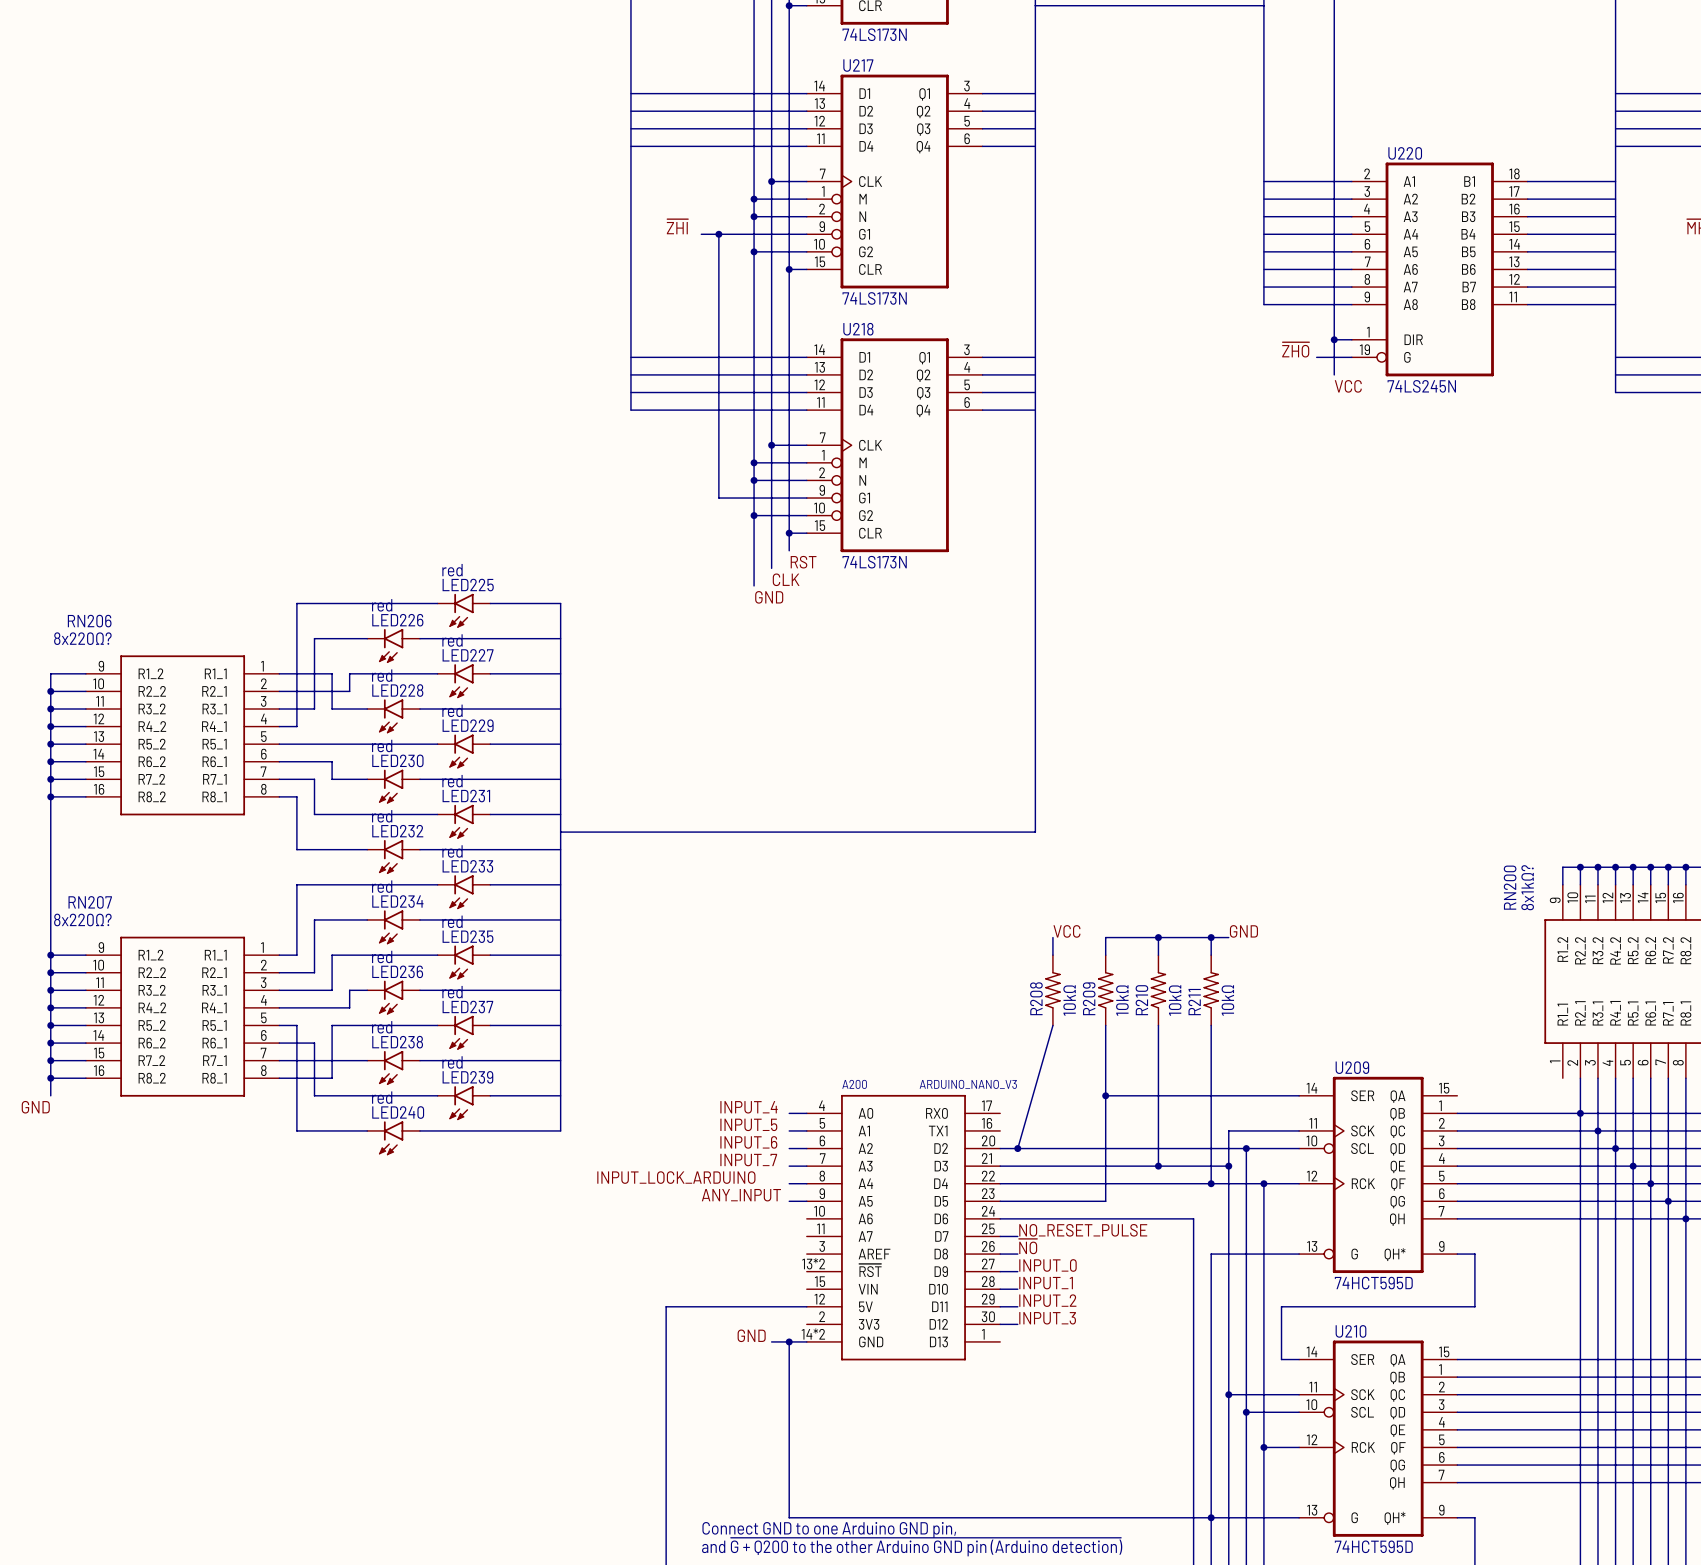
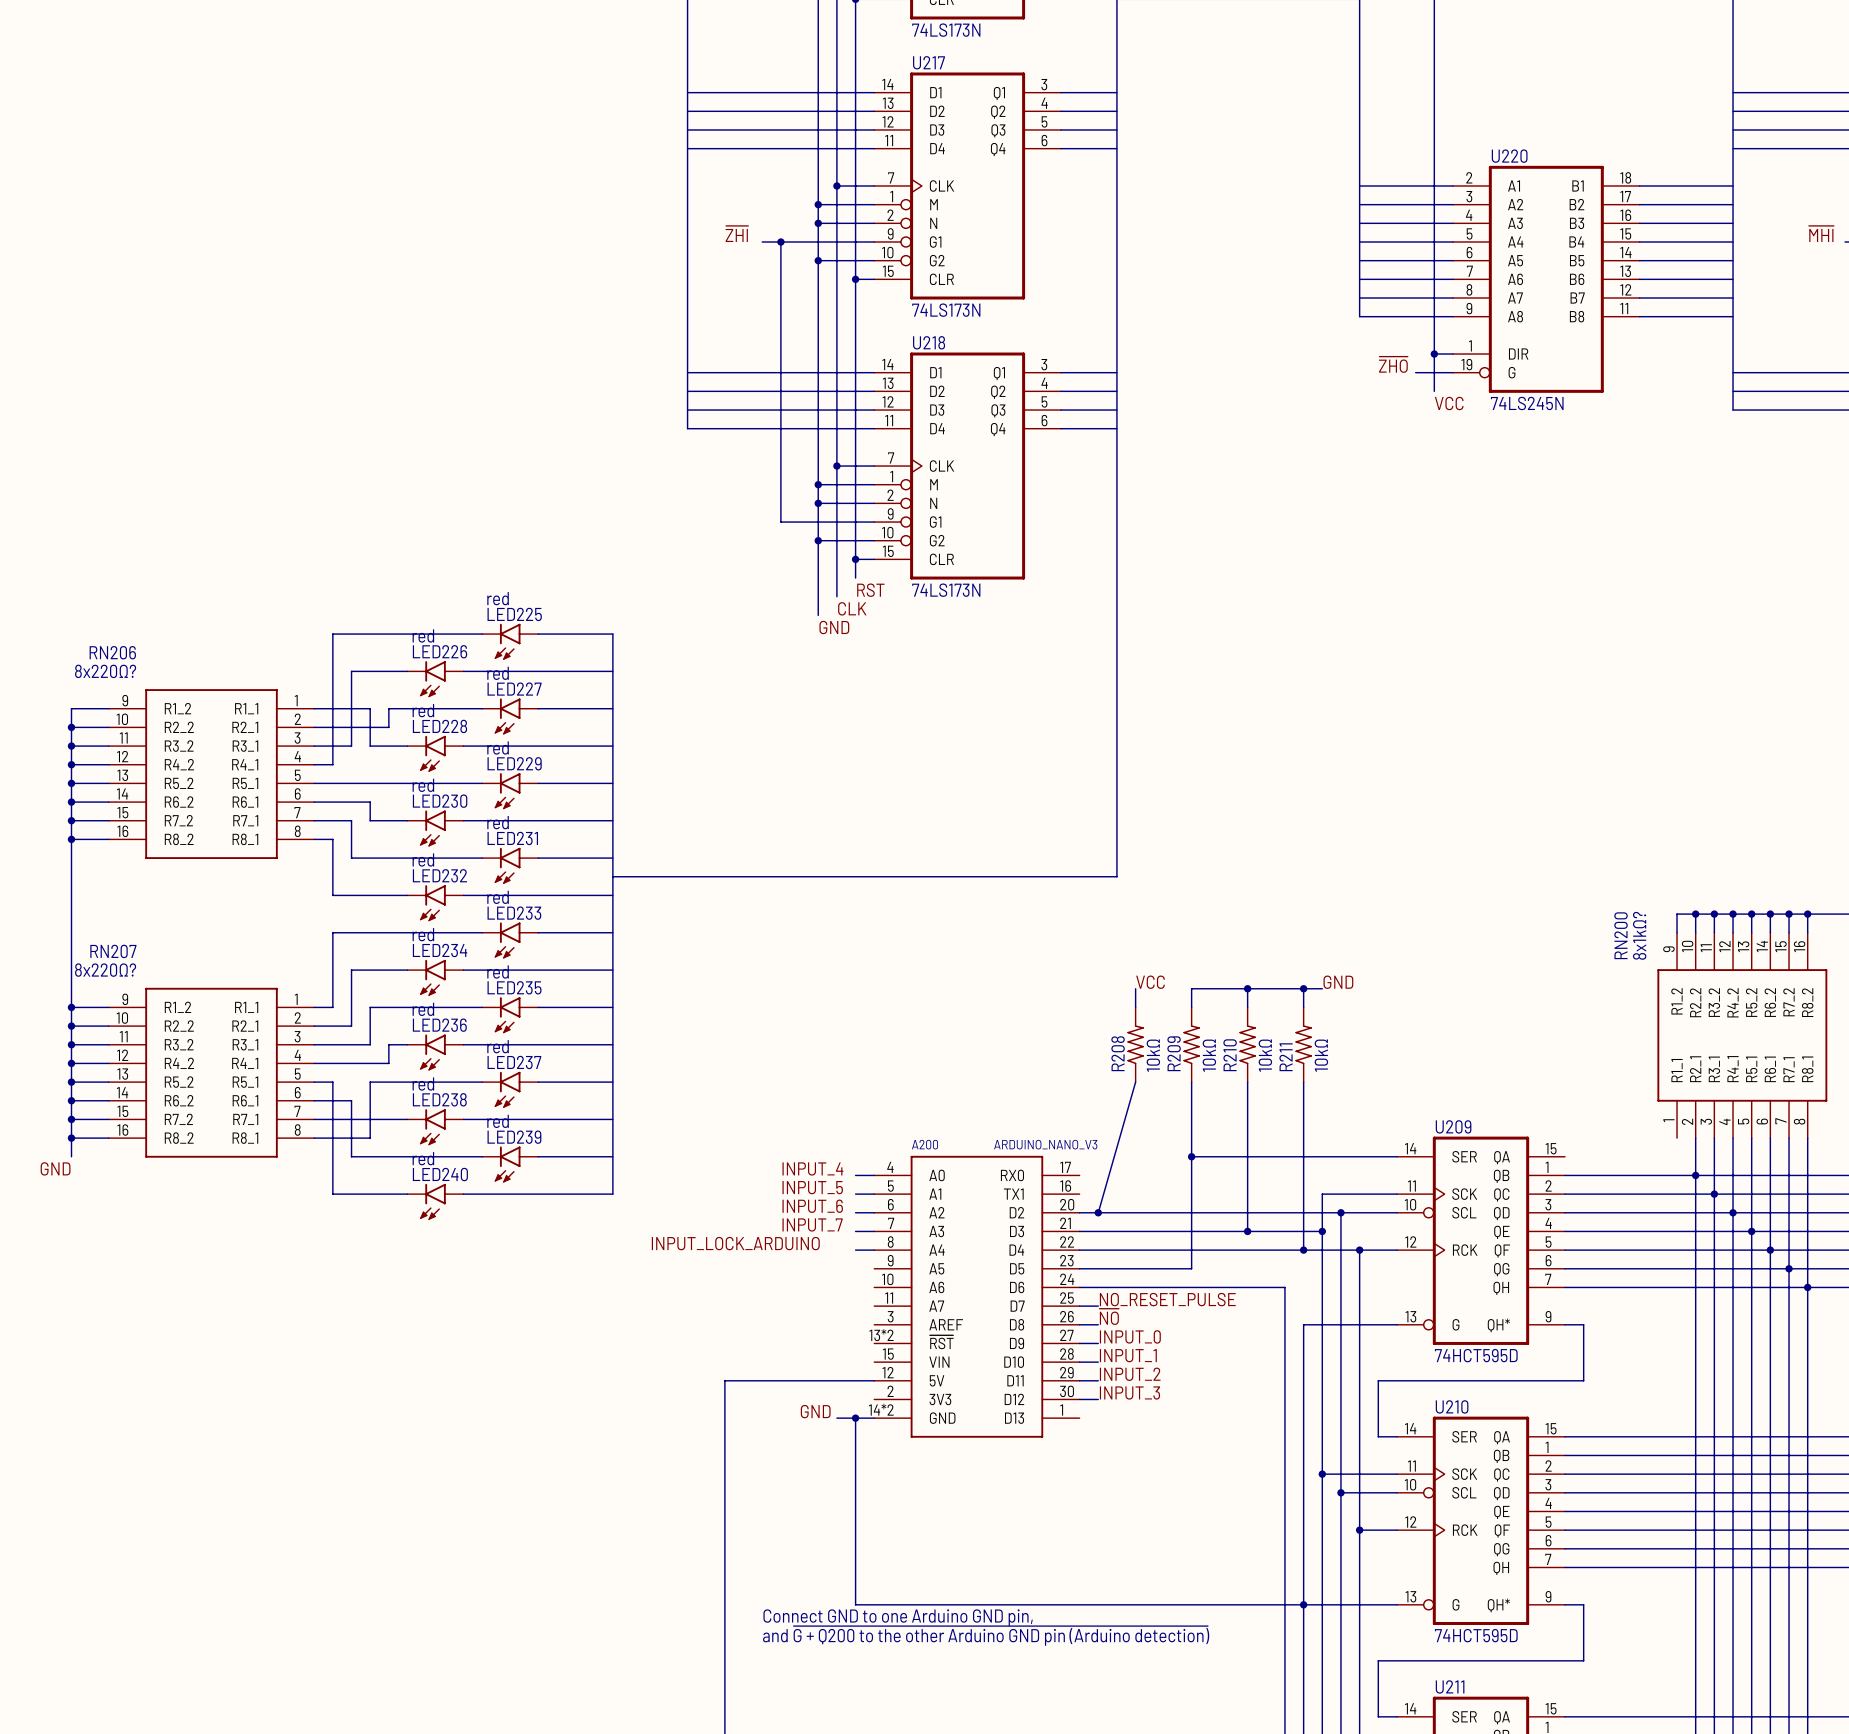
label: ANY_INPUT (741, 1195) -> none
wire: (789, 1201) (806, 1201) -> none

